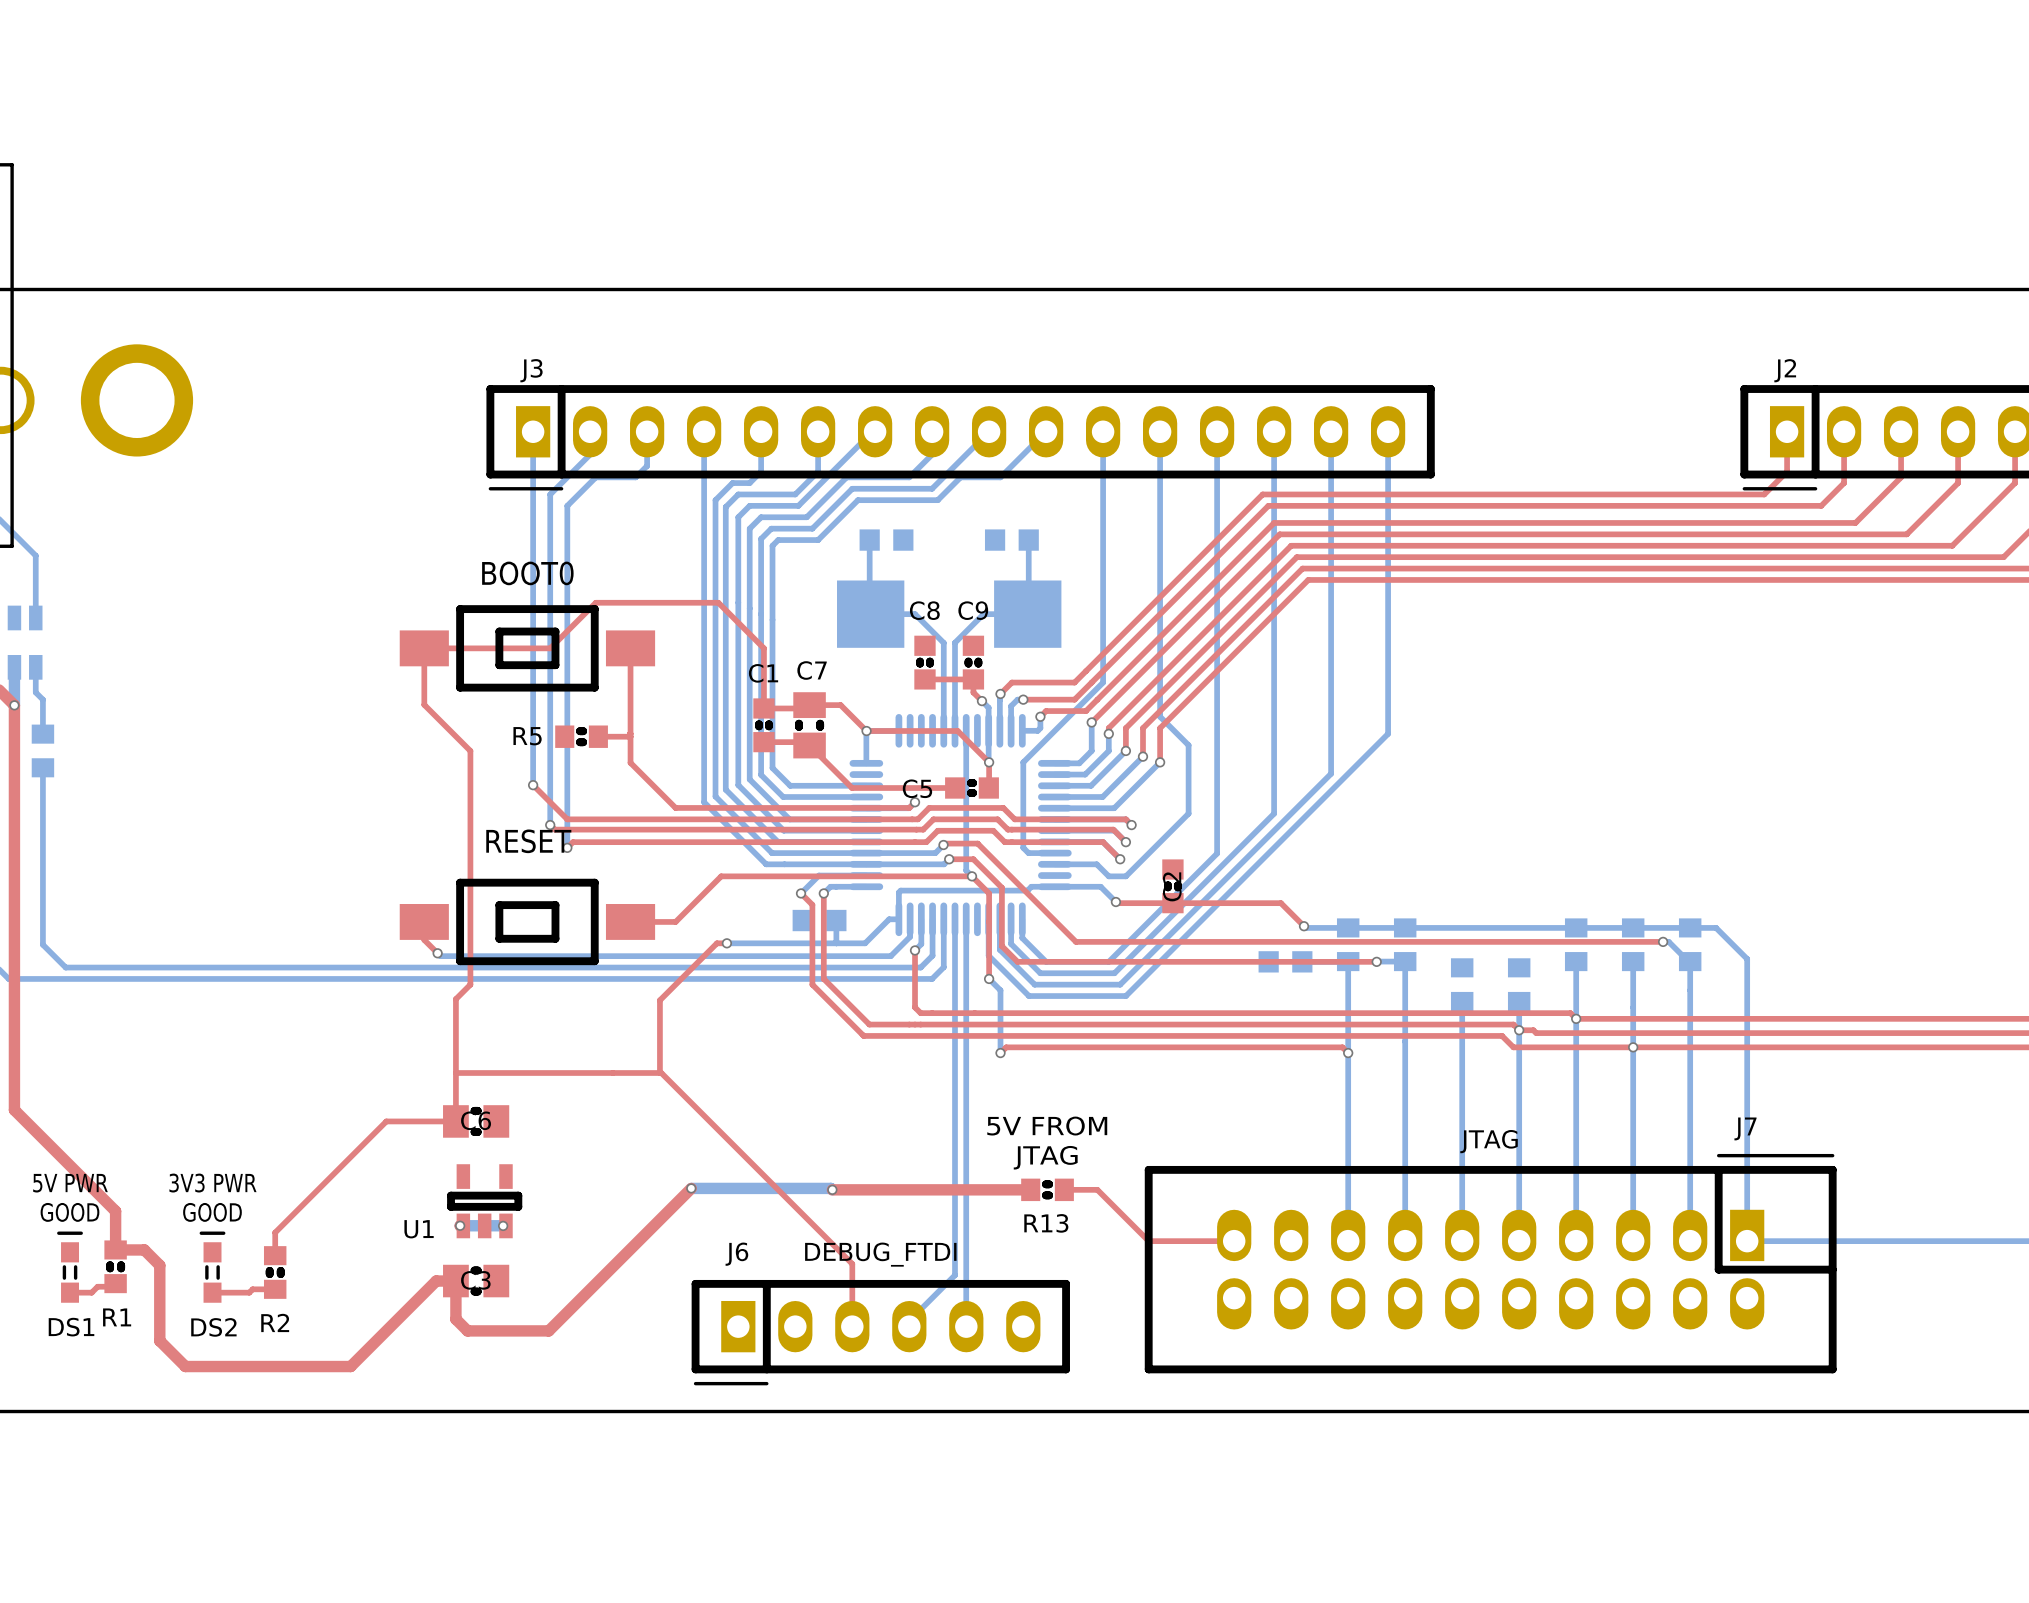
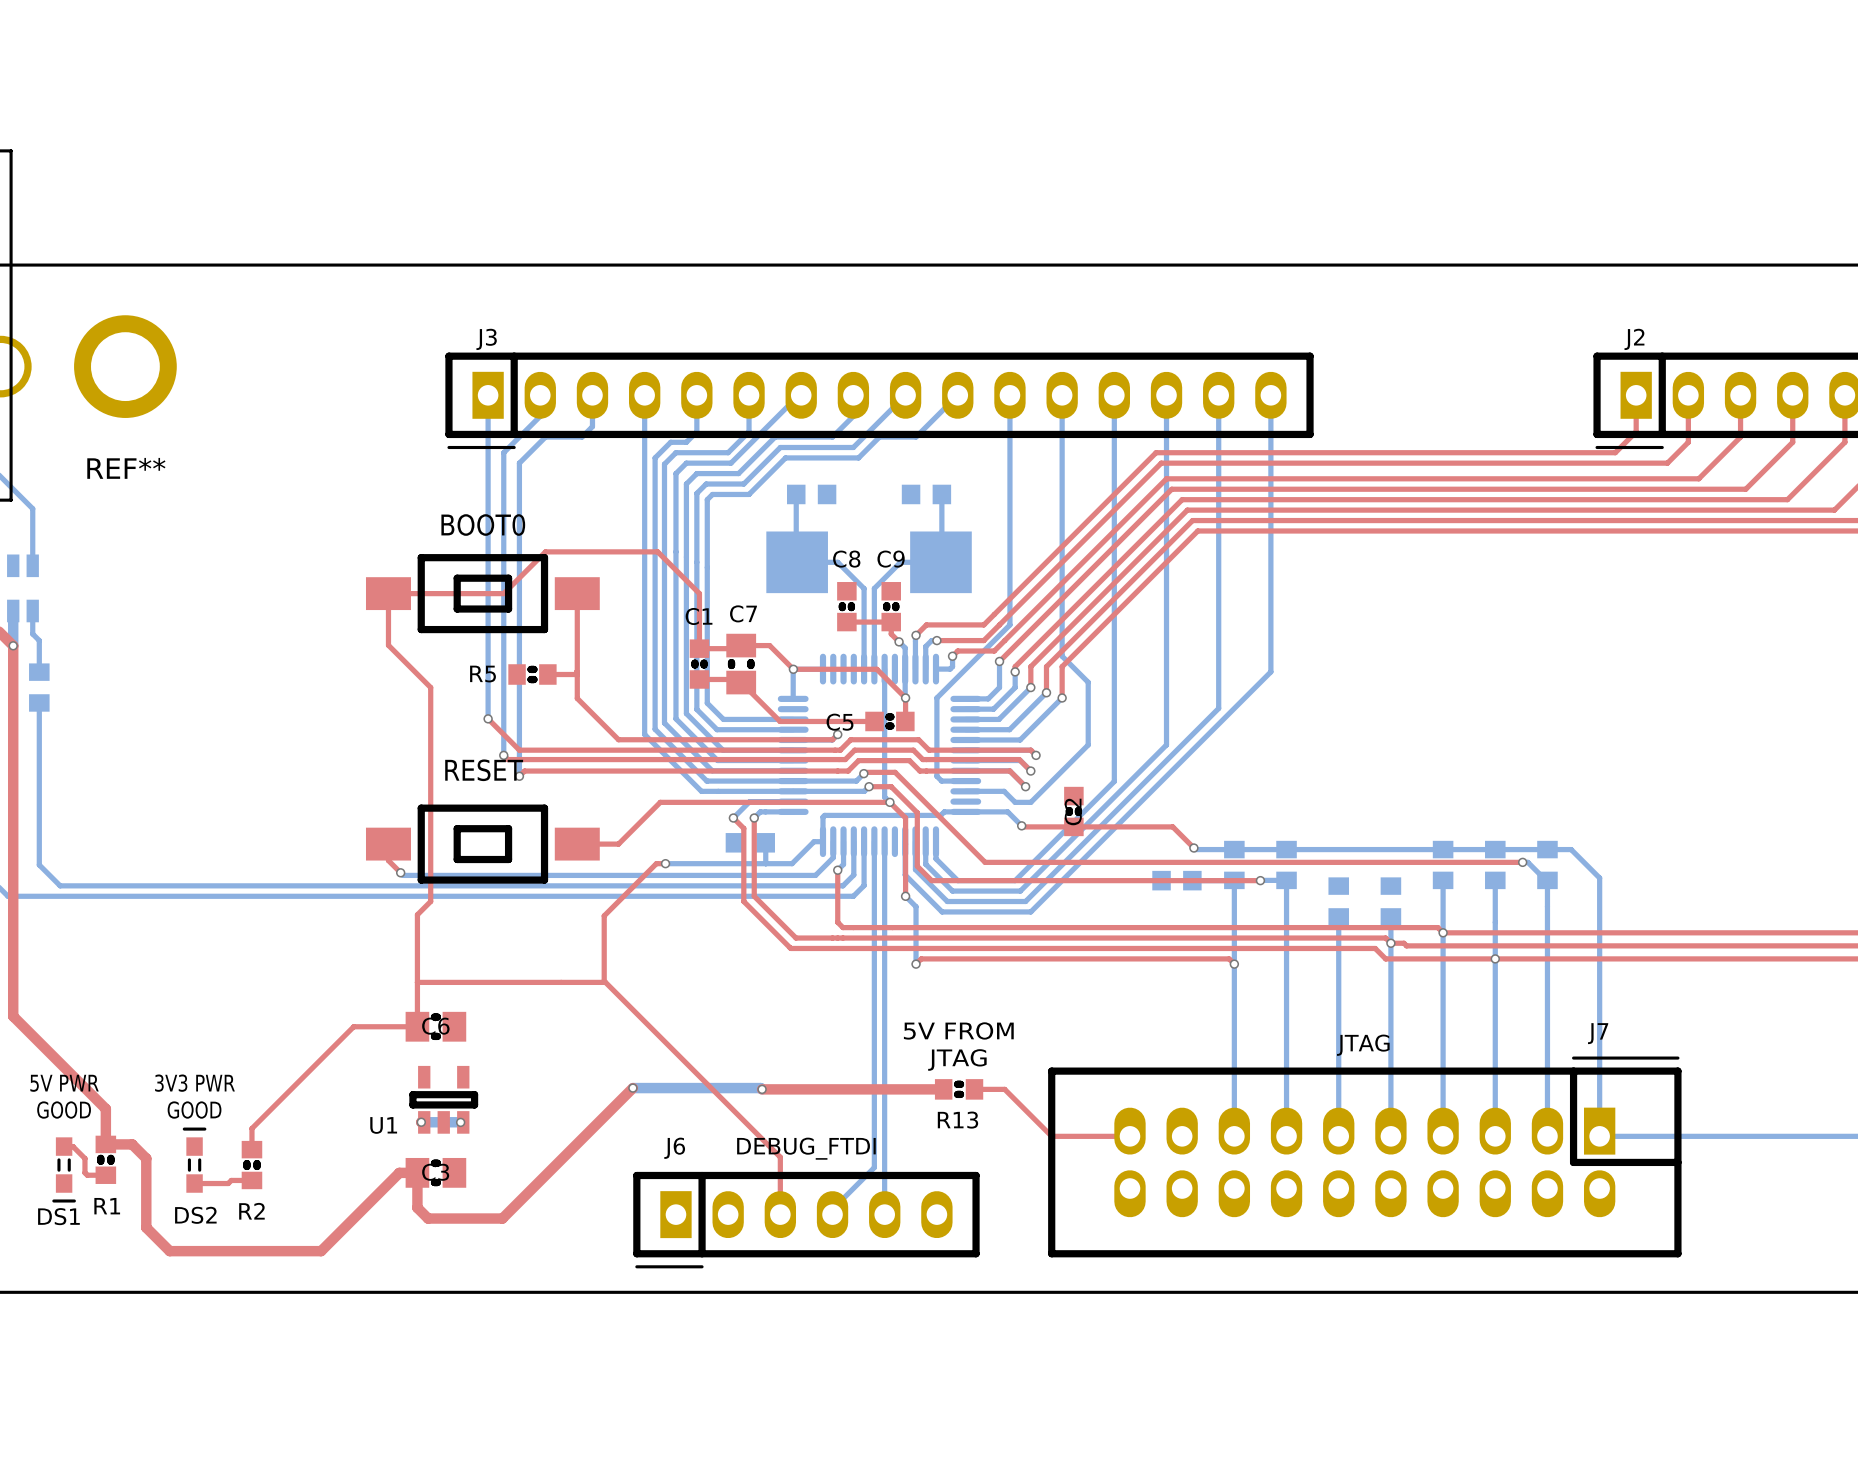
REF** name: none -> REF** (126, 468)
DS1 rotation: 0° (70, 1267) -> 180° (64, 1169)
top track: (115, 1283) (112, 1286) (97, 1286) (91, 1292) (70, 1292) -> (105, 1175) (87, 1175) (84, 1172) (84, 1158) (73, 1146) (64, 1146)

